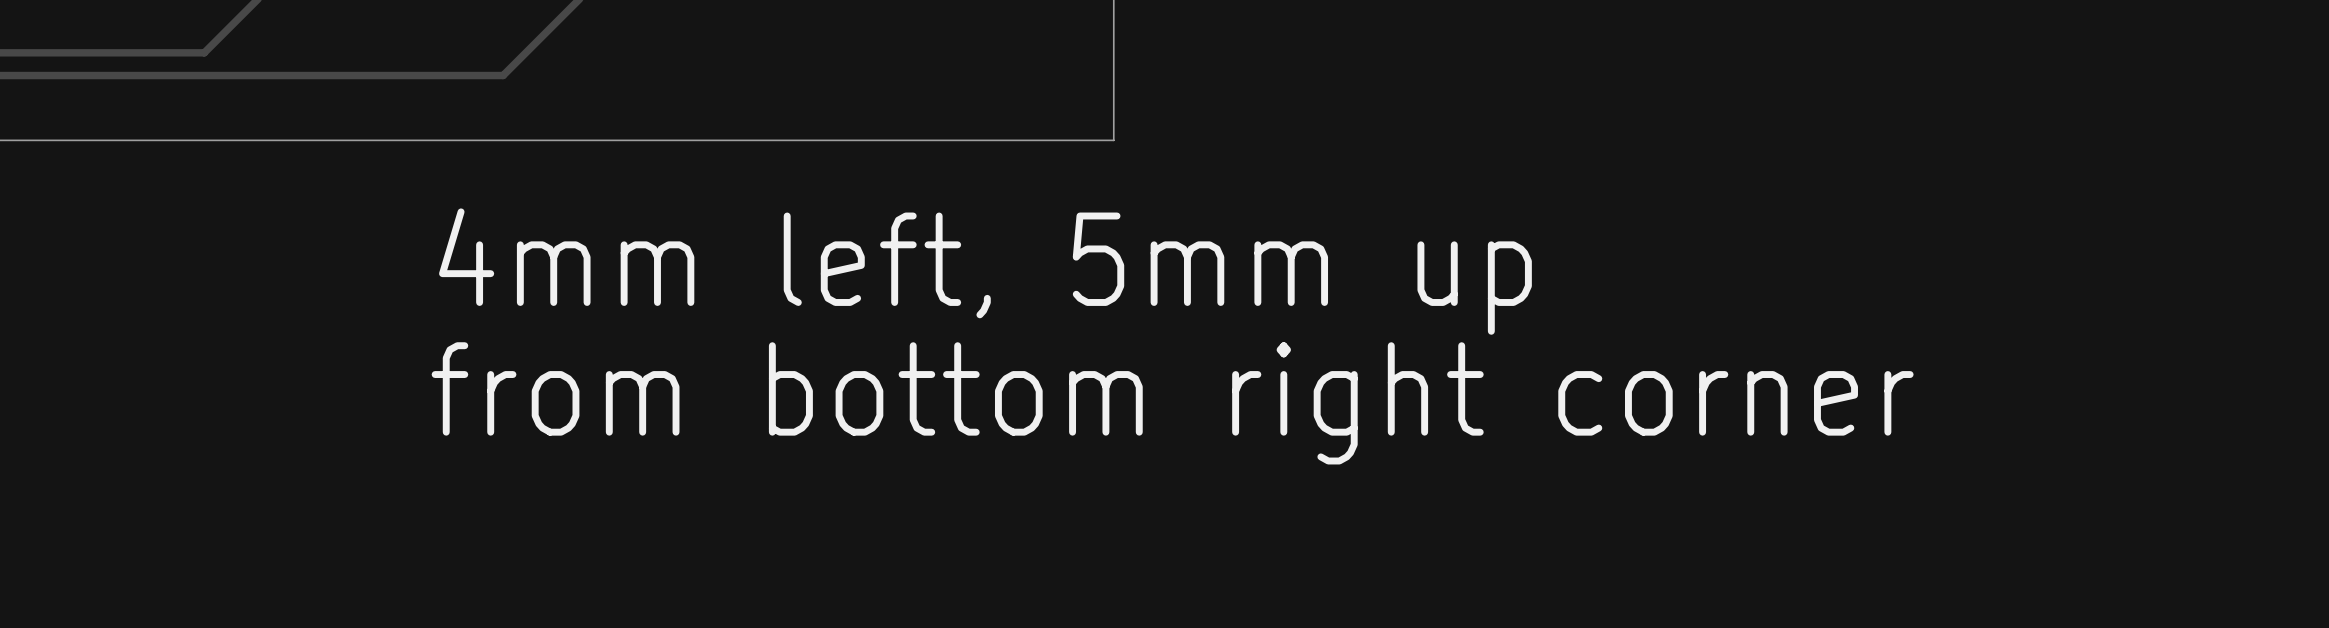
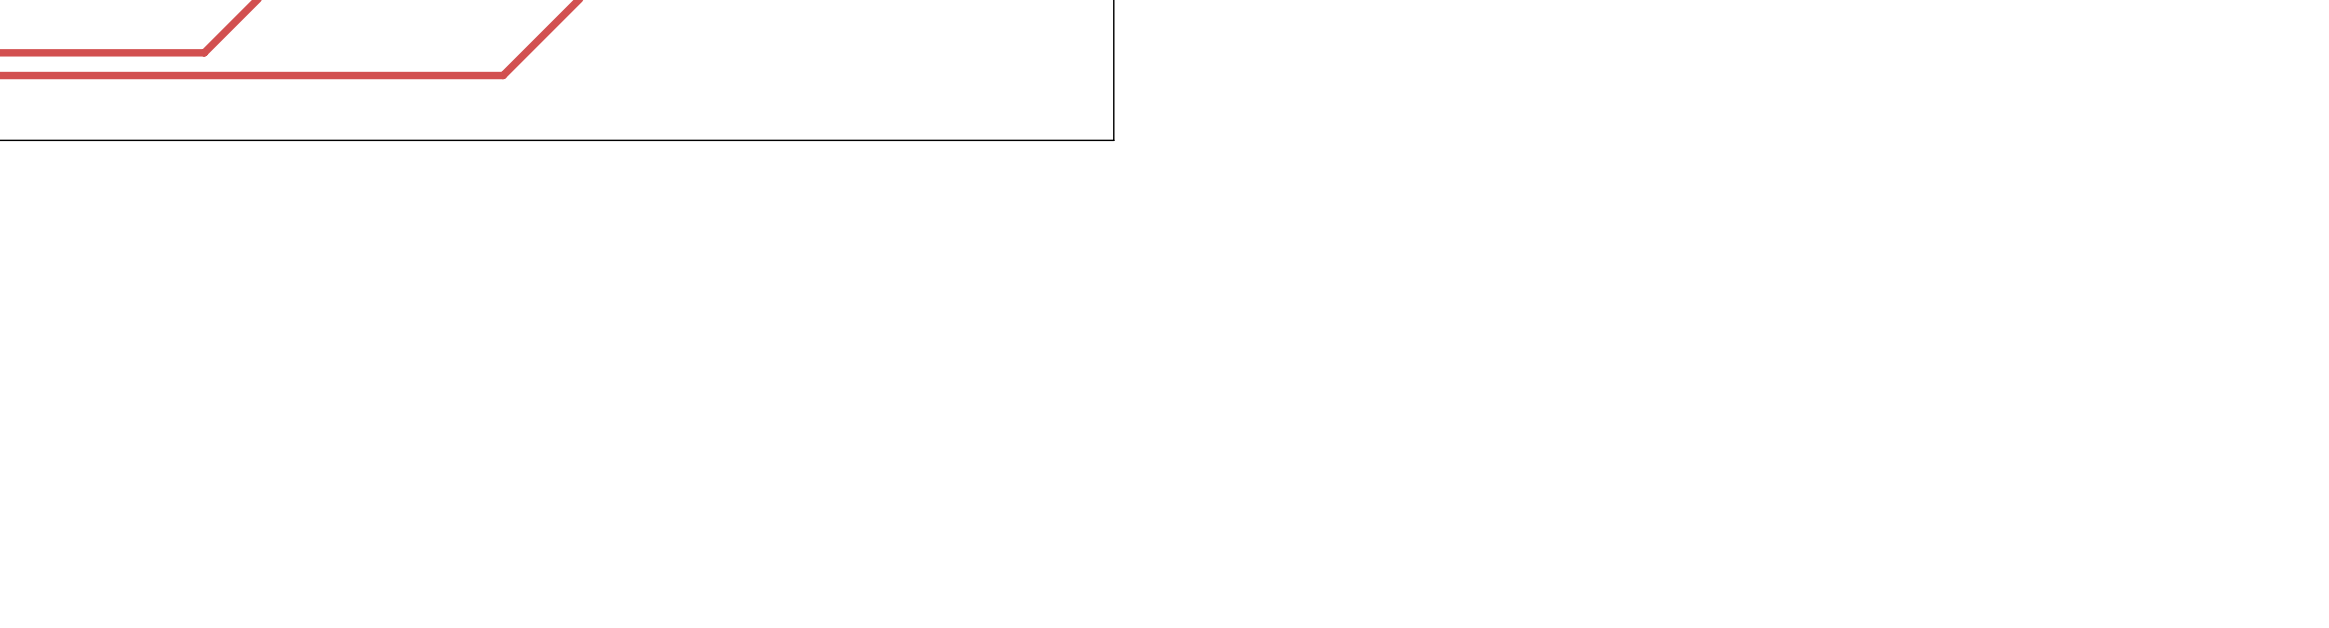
text: 4mm left, 5mm up (985, 271) -> none
text: from bottom right corner (1172, 403) -> none

